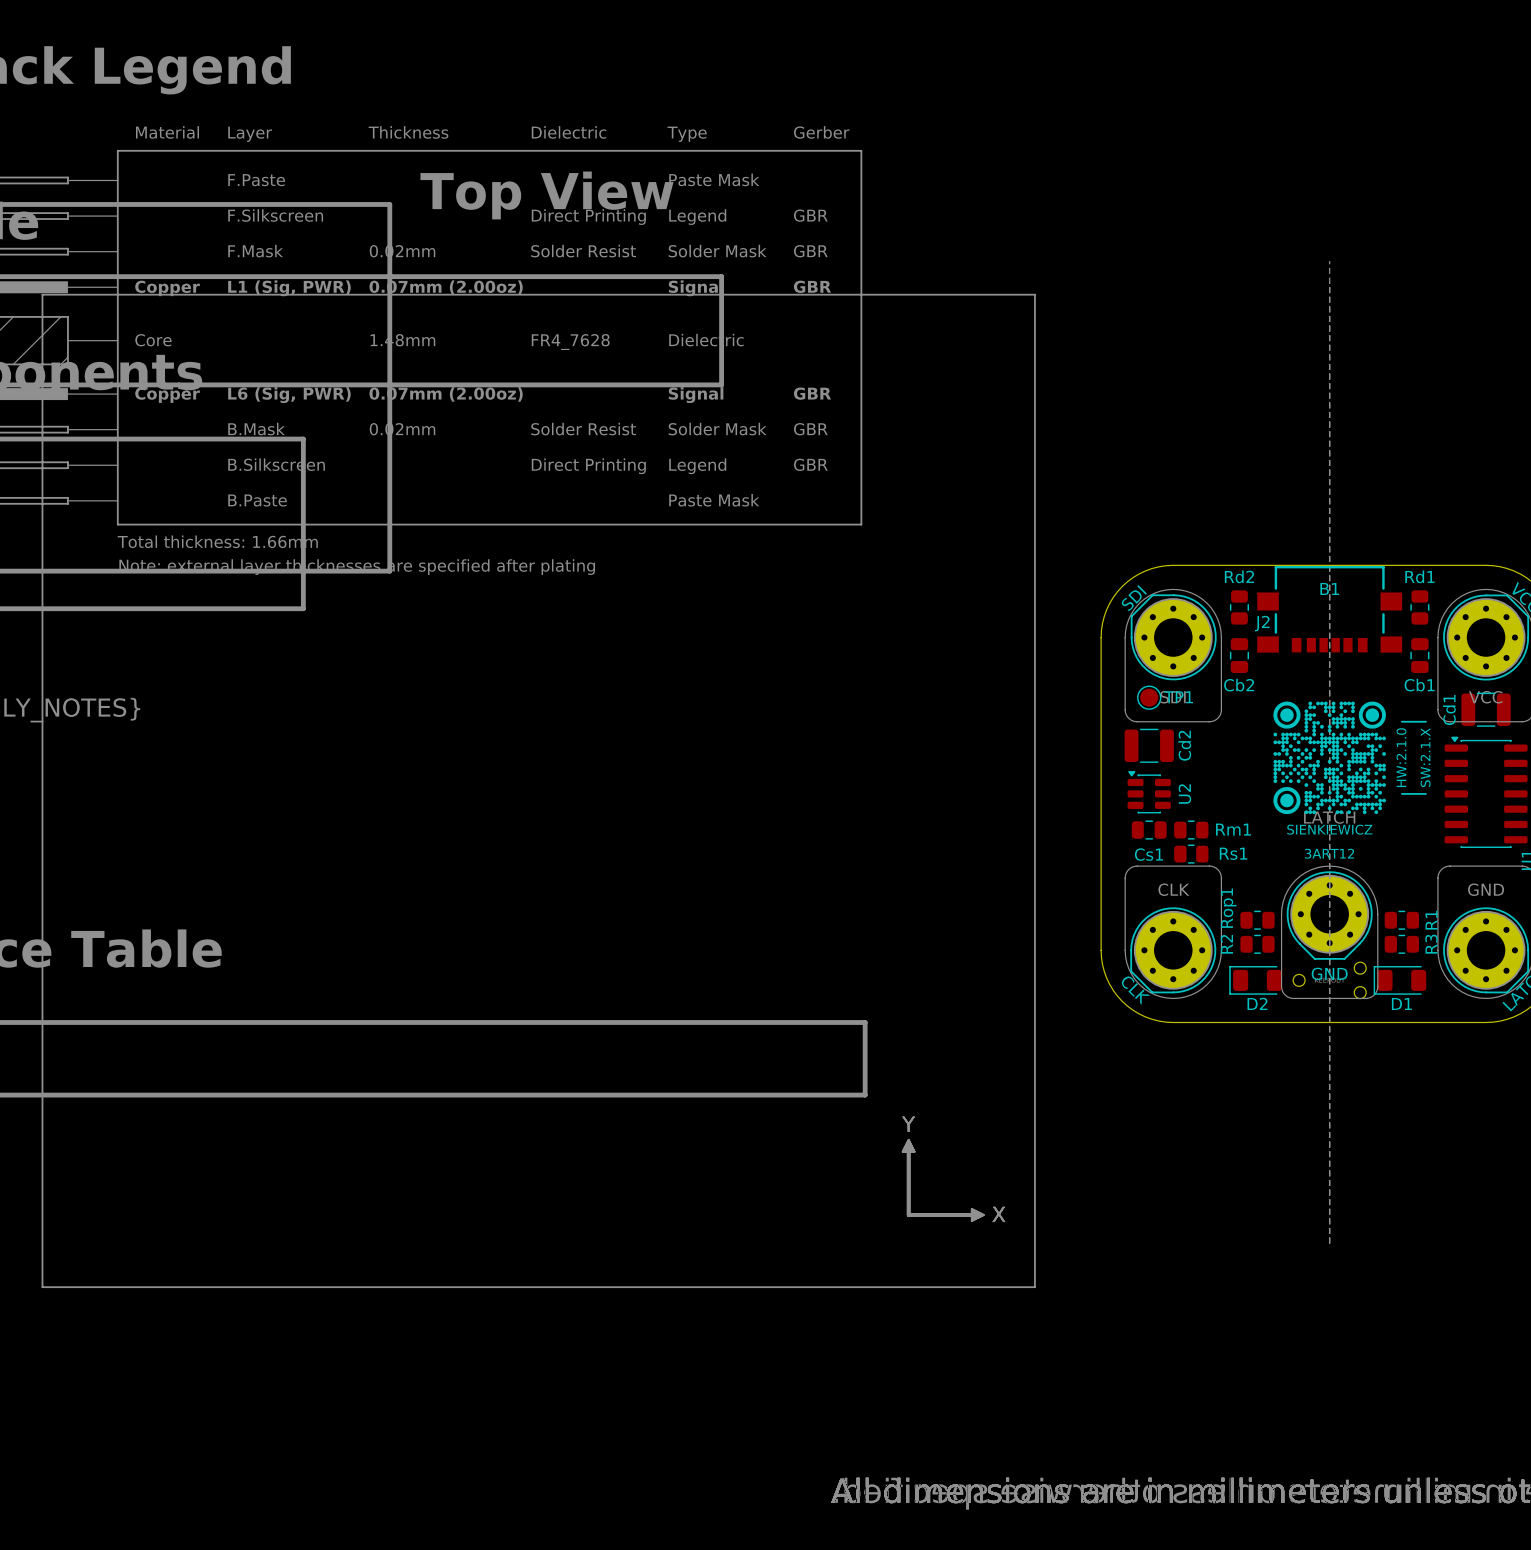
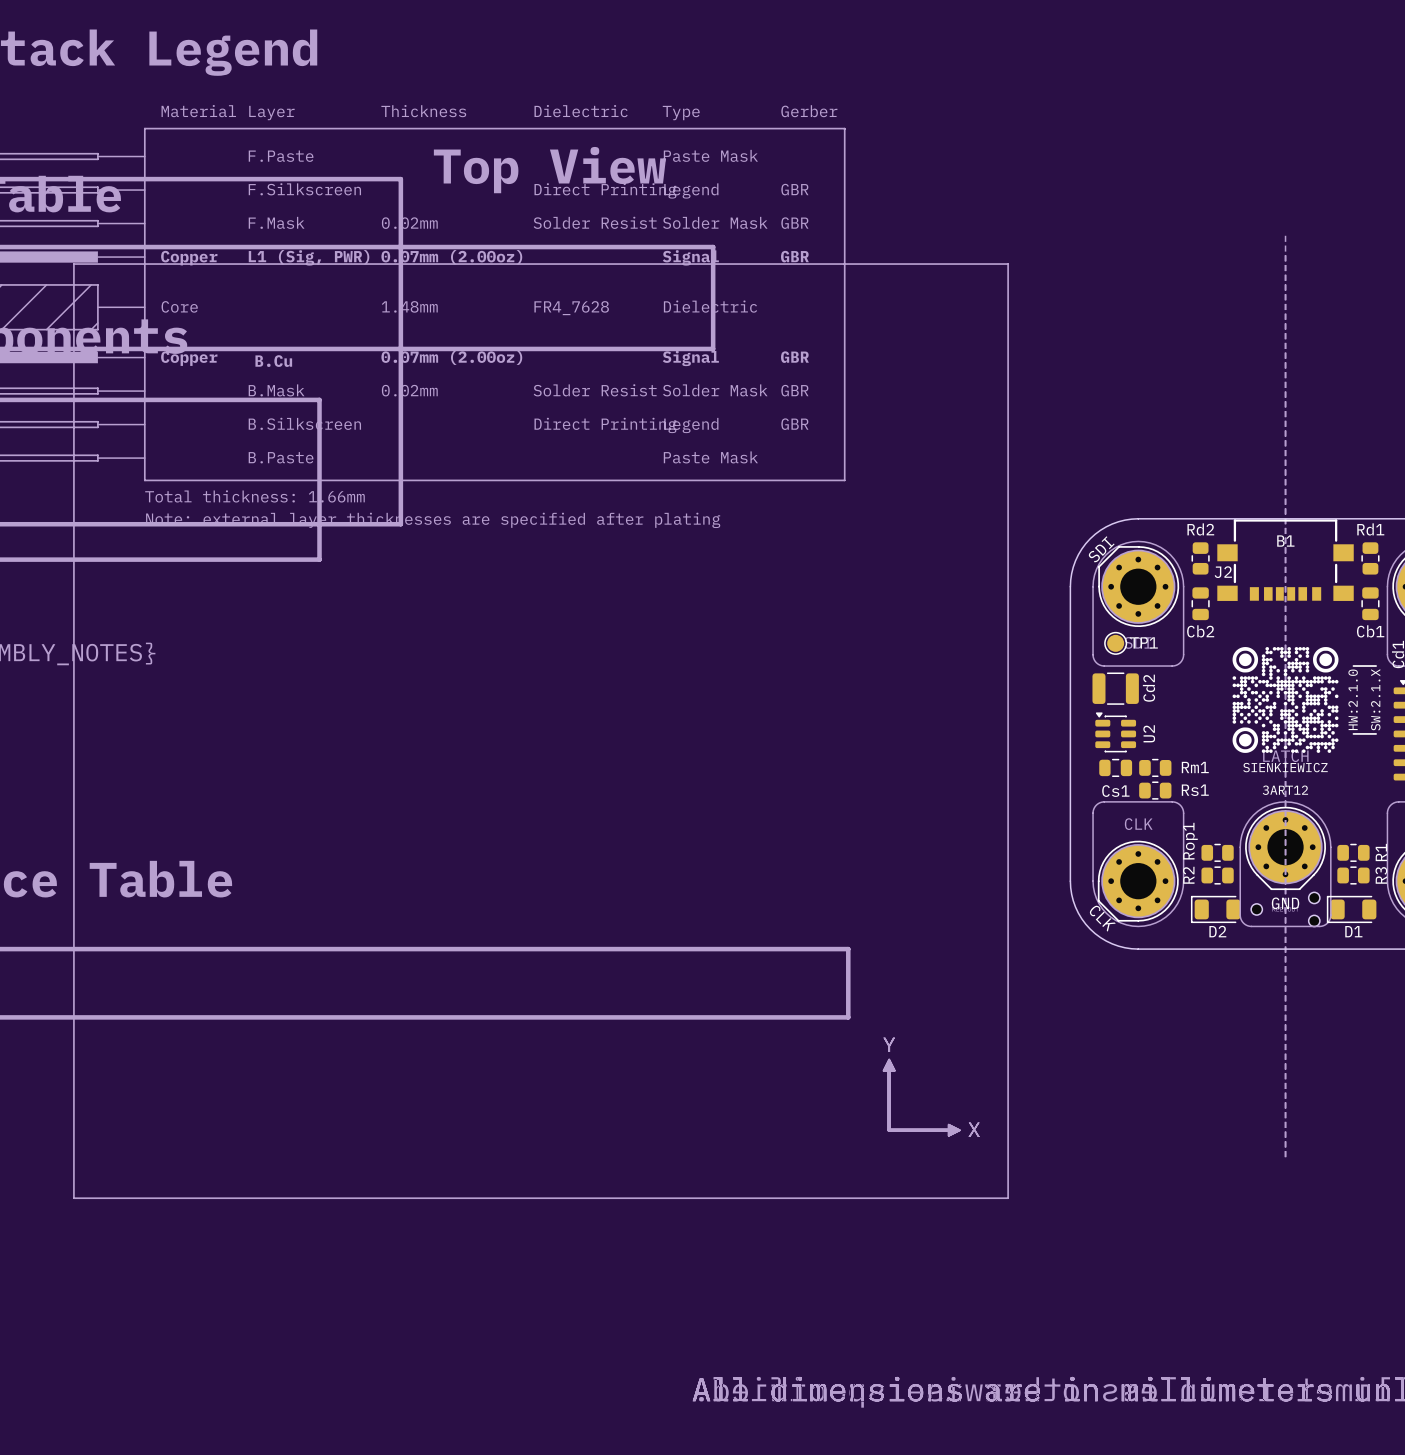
text: L6 (Sig, PWR) (289, 395) -> B.Cu (273, 361)

